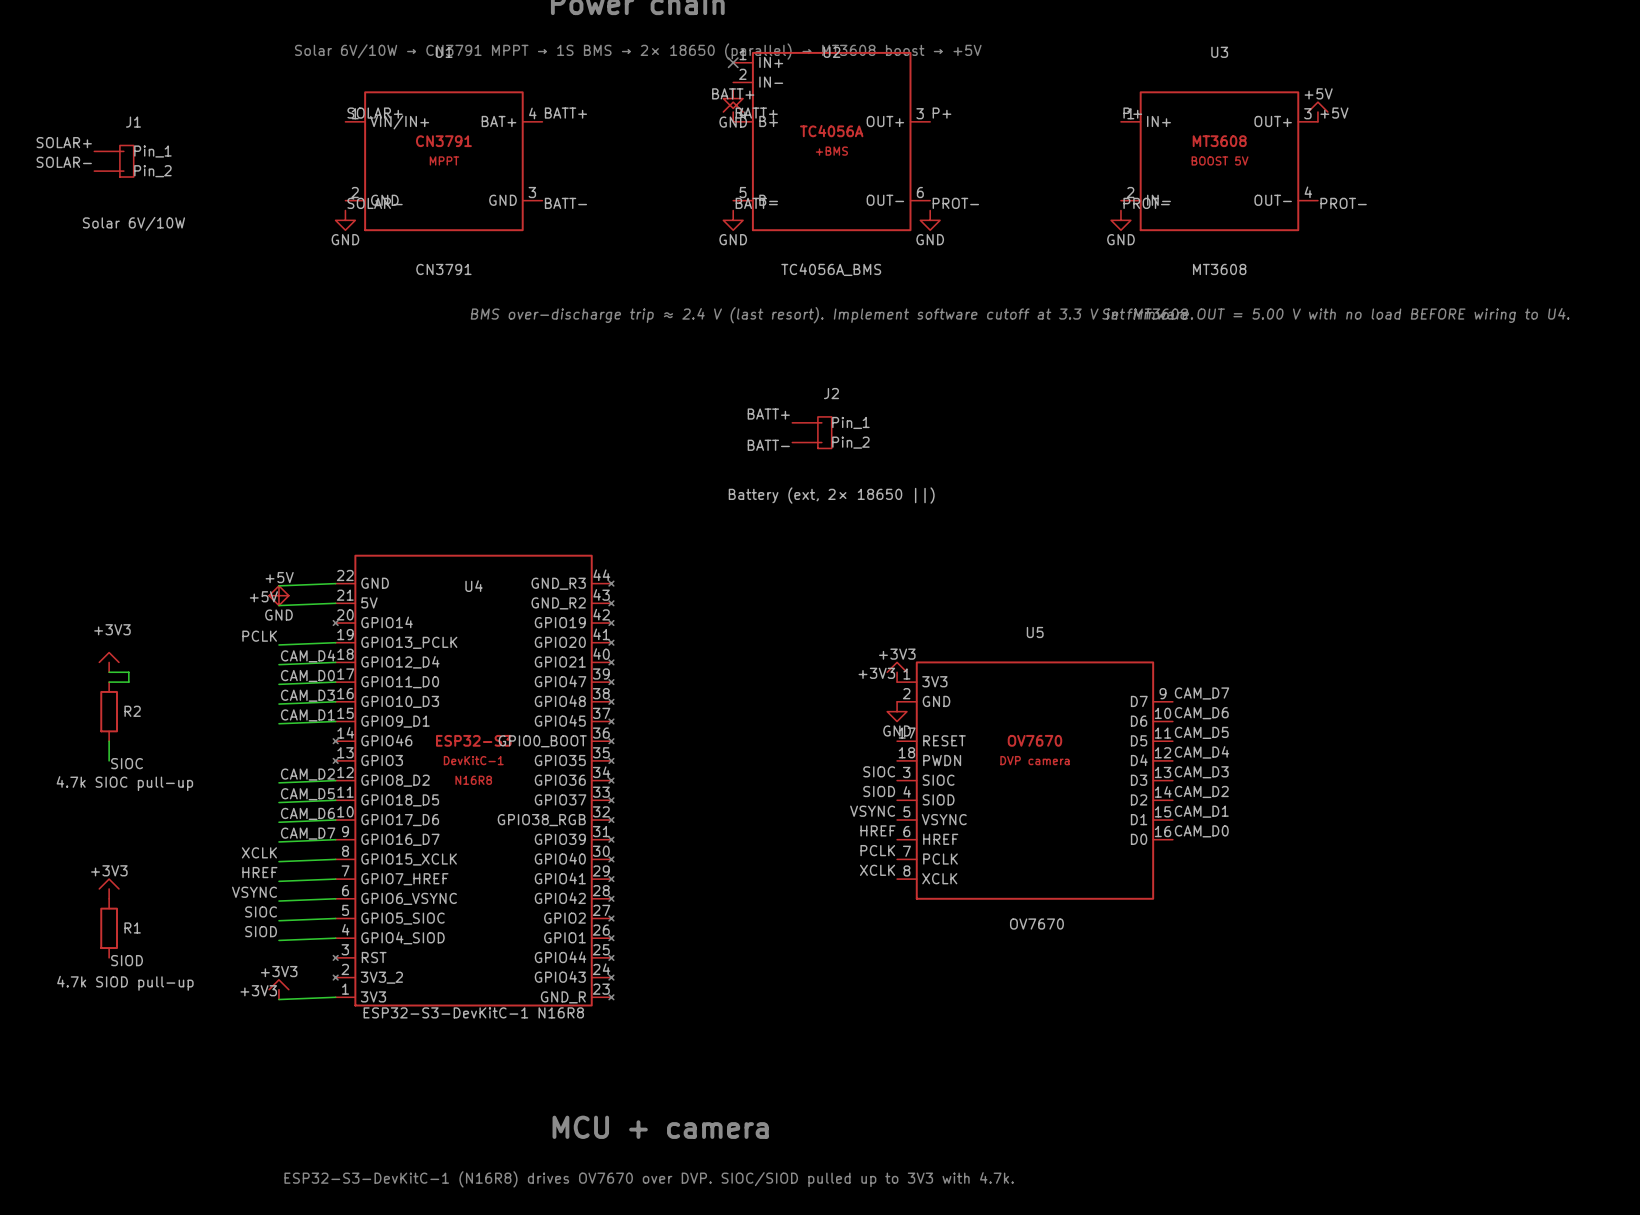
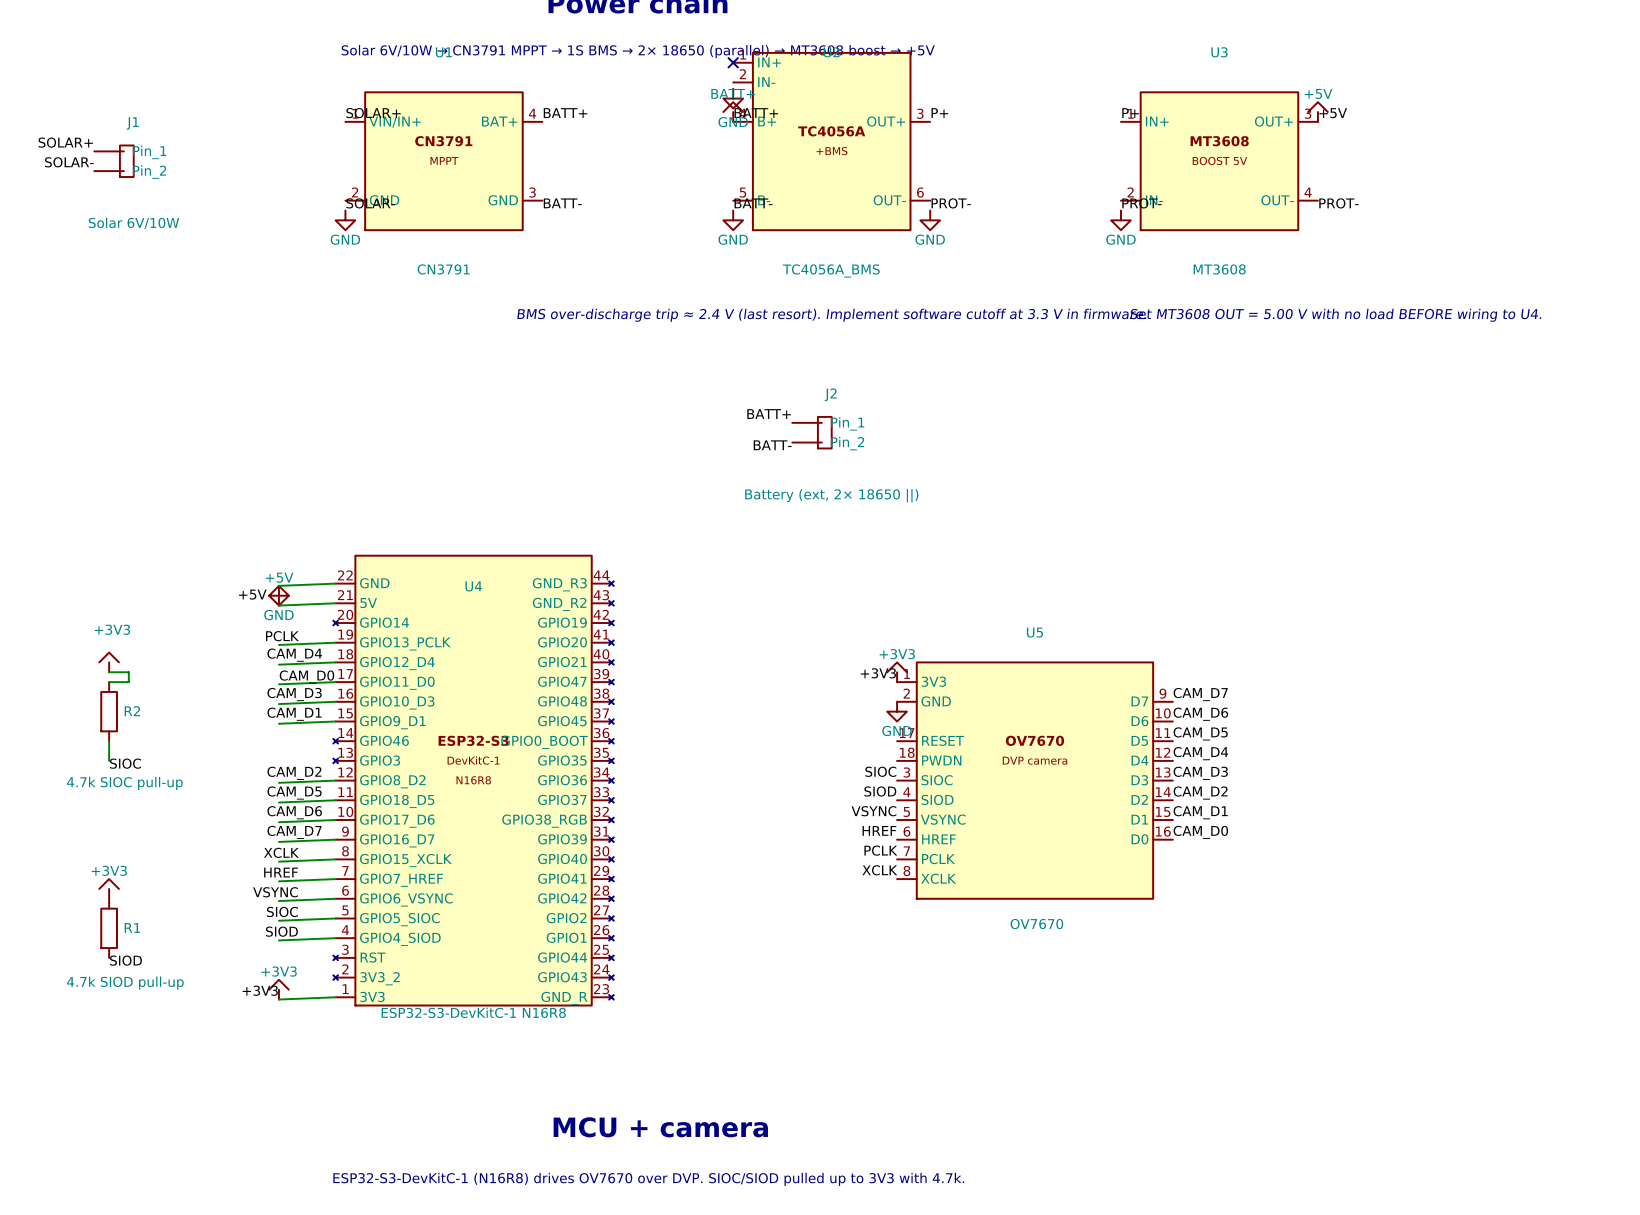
label position: +5V (263, 596) -> +5V (252, 594)
label position: PCLK (259, 636) -> PCLK (282, 636)
label position: CAM_D4 (308, 656) -> CAM_D4 (294, 655)
label position: CAM_D3 (307, 695) -> CAM_D3 (294, 694)
label position: CAM_D1 (307, 715) -> CAM_D1 (294, 714)
label position: CAM_D2 (307, 774) -> CAM_D2 (294, 773)
label position: CAM_D5 (307, 794) -> CAM_D5 (294, 793)
label position: CAM_D6 (307, 813) -> CAM_D6 (294, 812)
label position: CAM_D7 (308, 833) -> CAM_D7 (294, 832)
label position: XCLK (259, 852) -> XCLK (281, 852)
label position: HREF (259, 872) -> HREF (281, 872)
label position: VSYNC (254, 892) -> VSYNC (275, 892)
label position: SIOC (261, 911) -> SIOC (282, 911)
label position: SIOD (261, 931) -> SIOD (281, 931)

